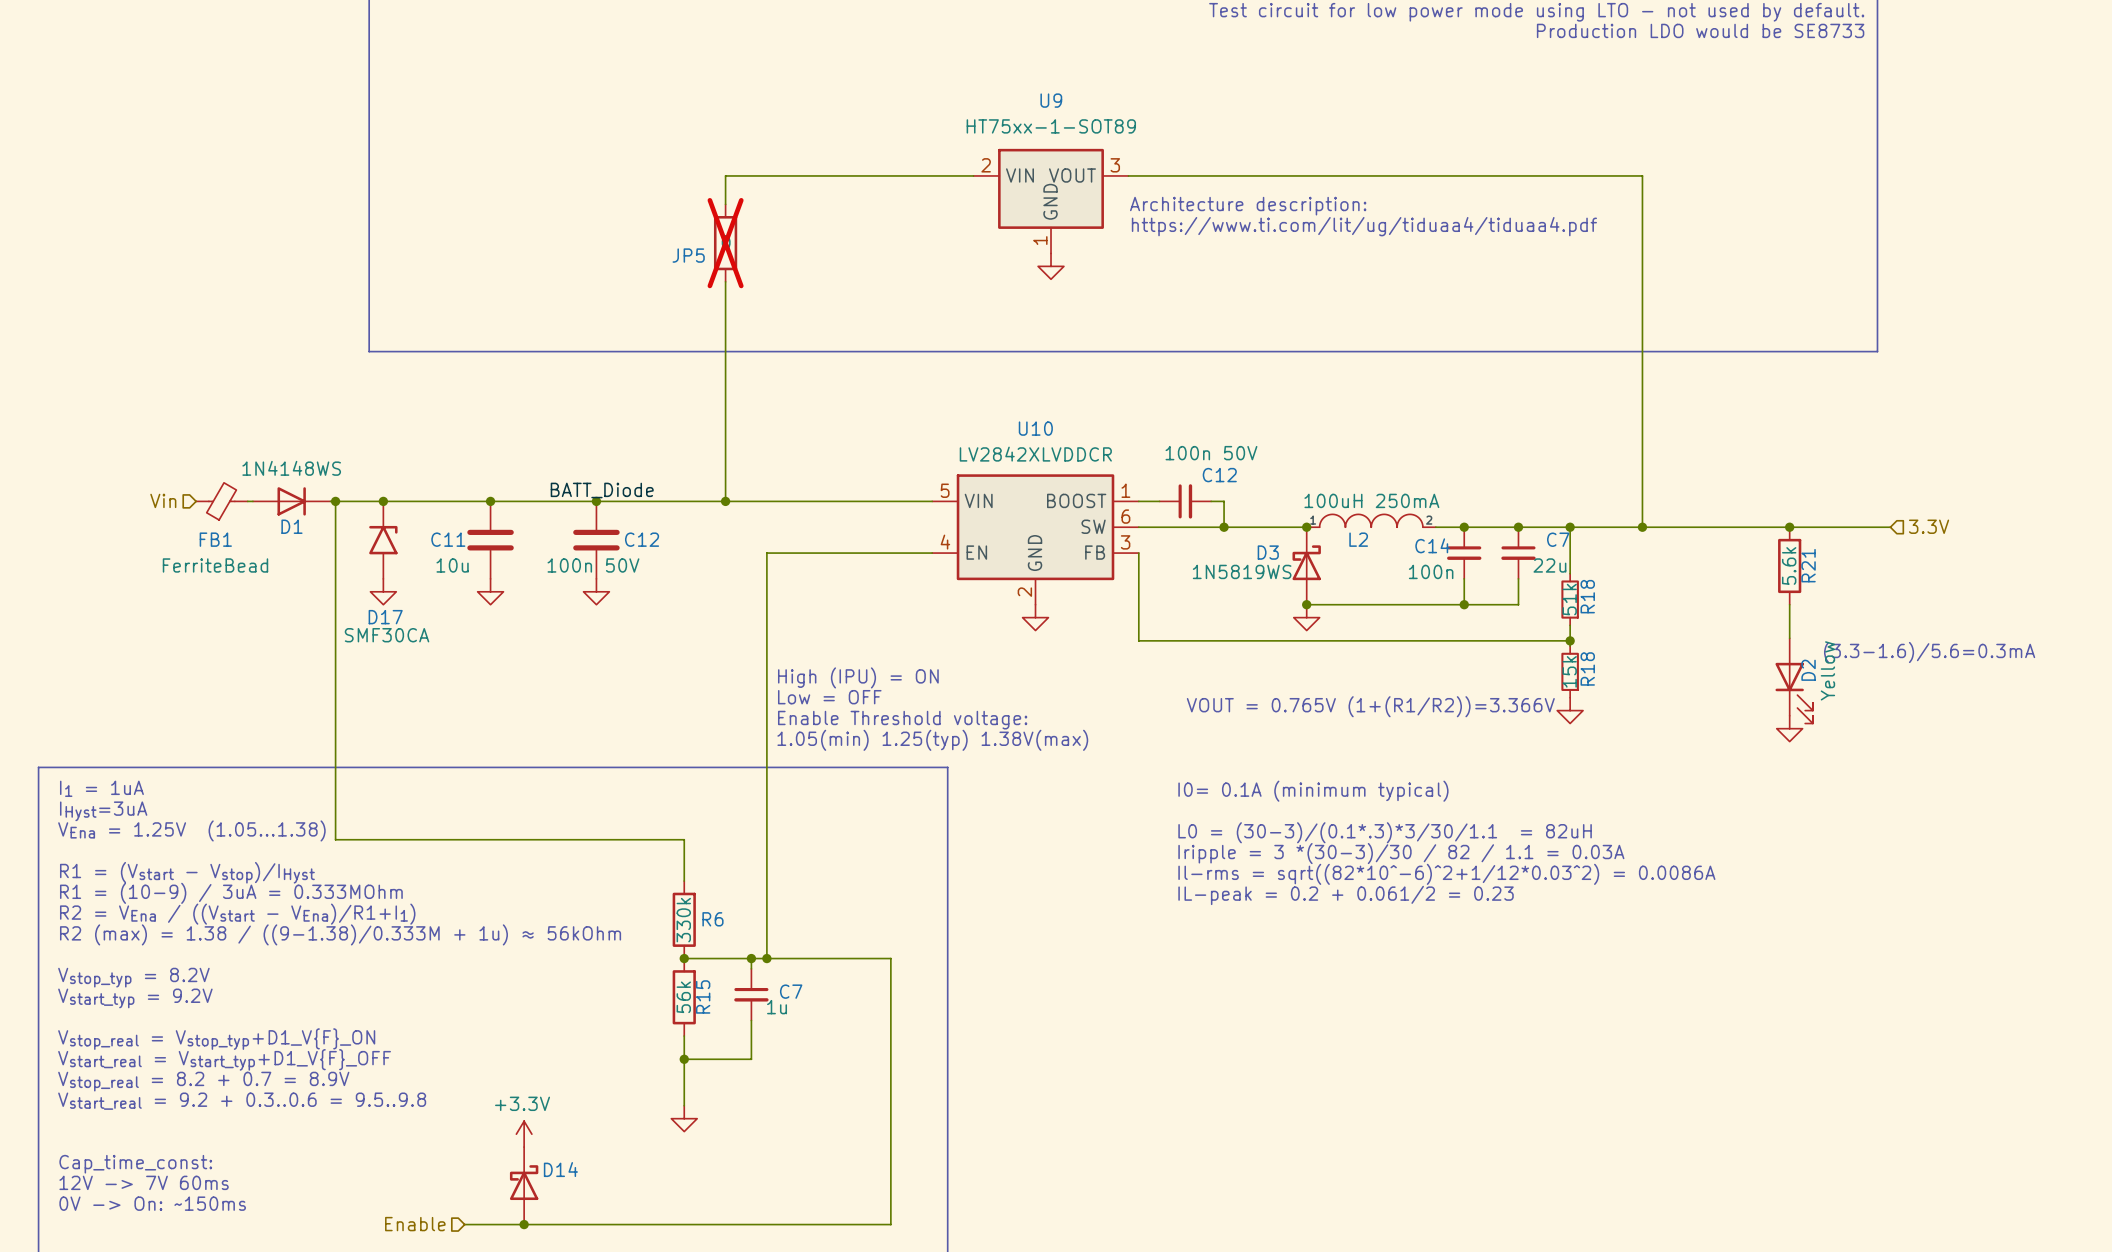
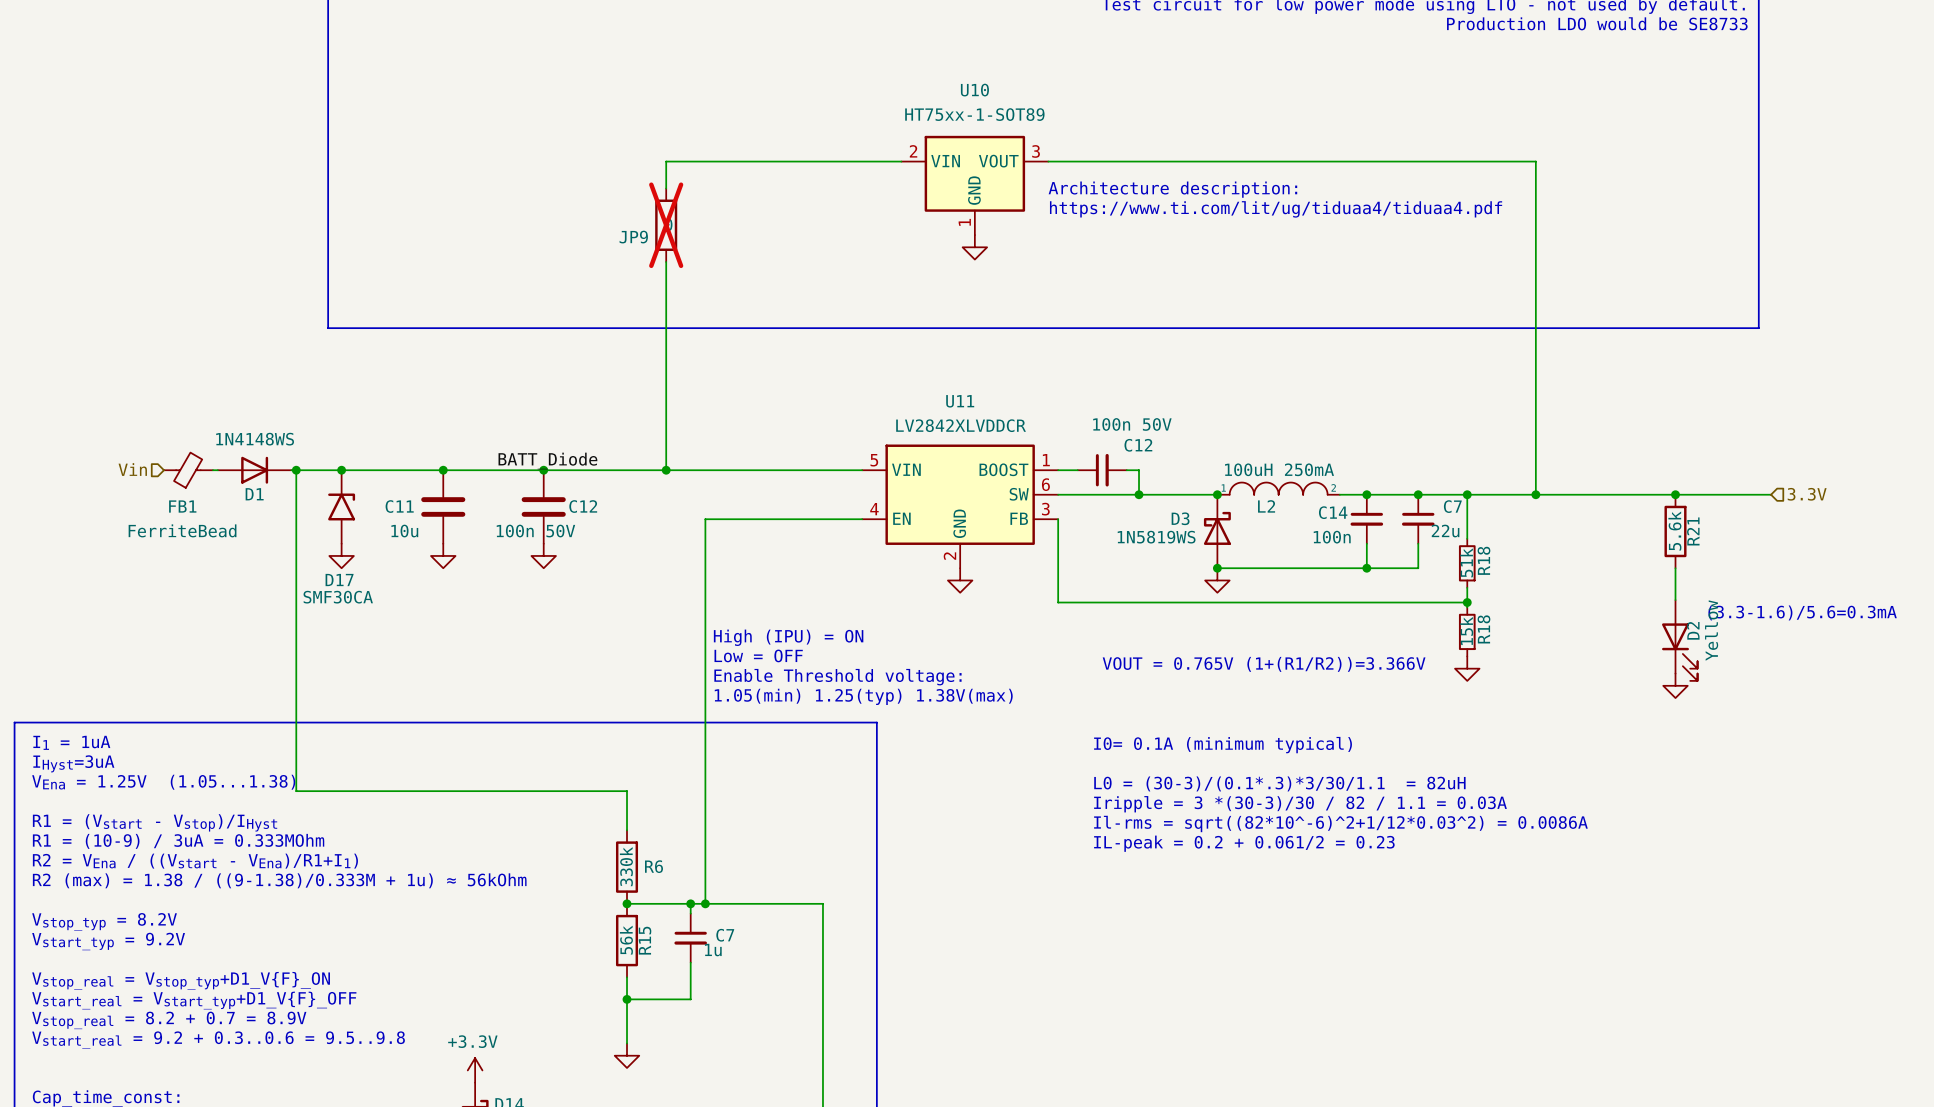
U9 name: U9 (1051, 100) -> U10 (974, 90)
JP5 name: JP5 (688, 255) -> JP9 (633, 237)
U10 name: U10 (1035, 428) -> U11 (960, 401)

